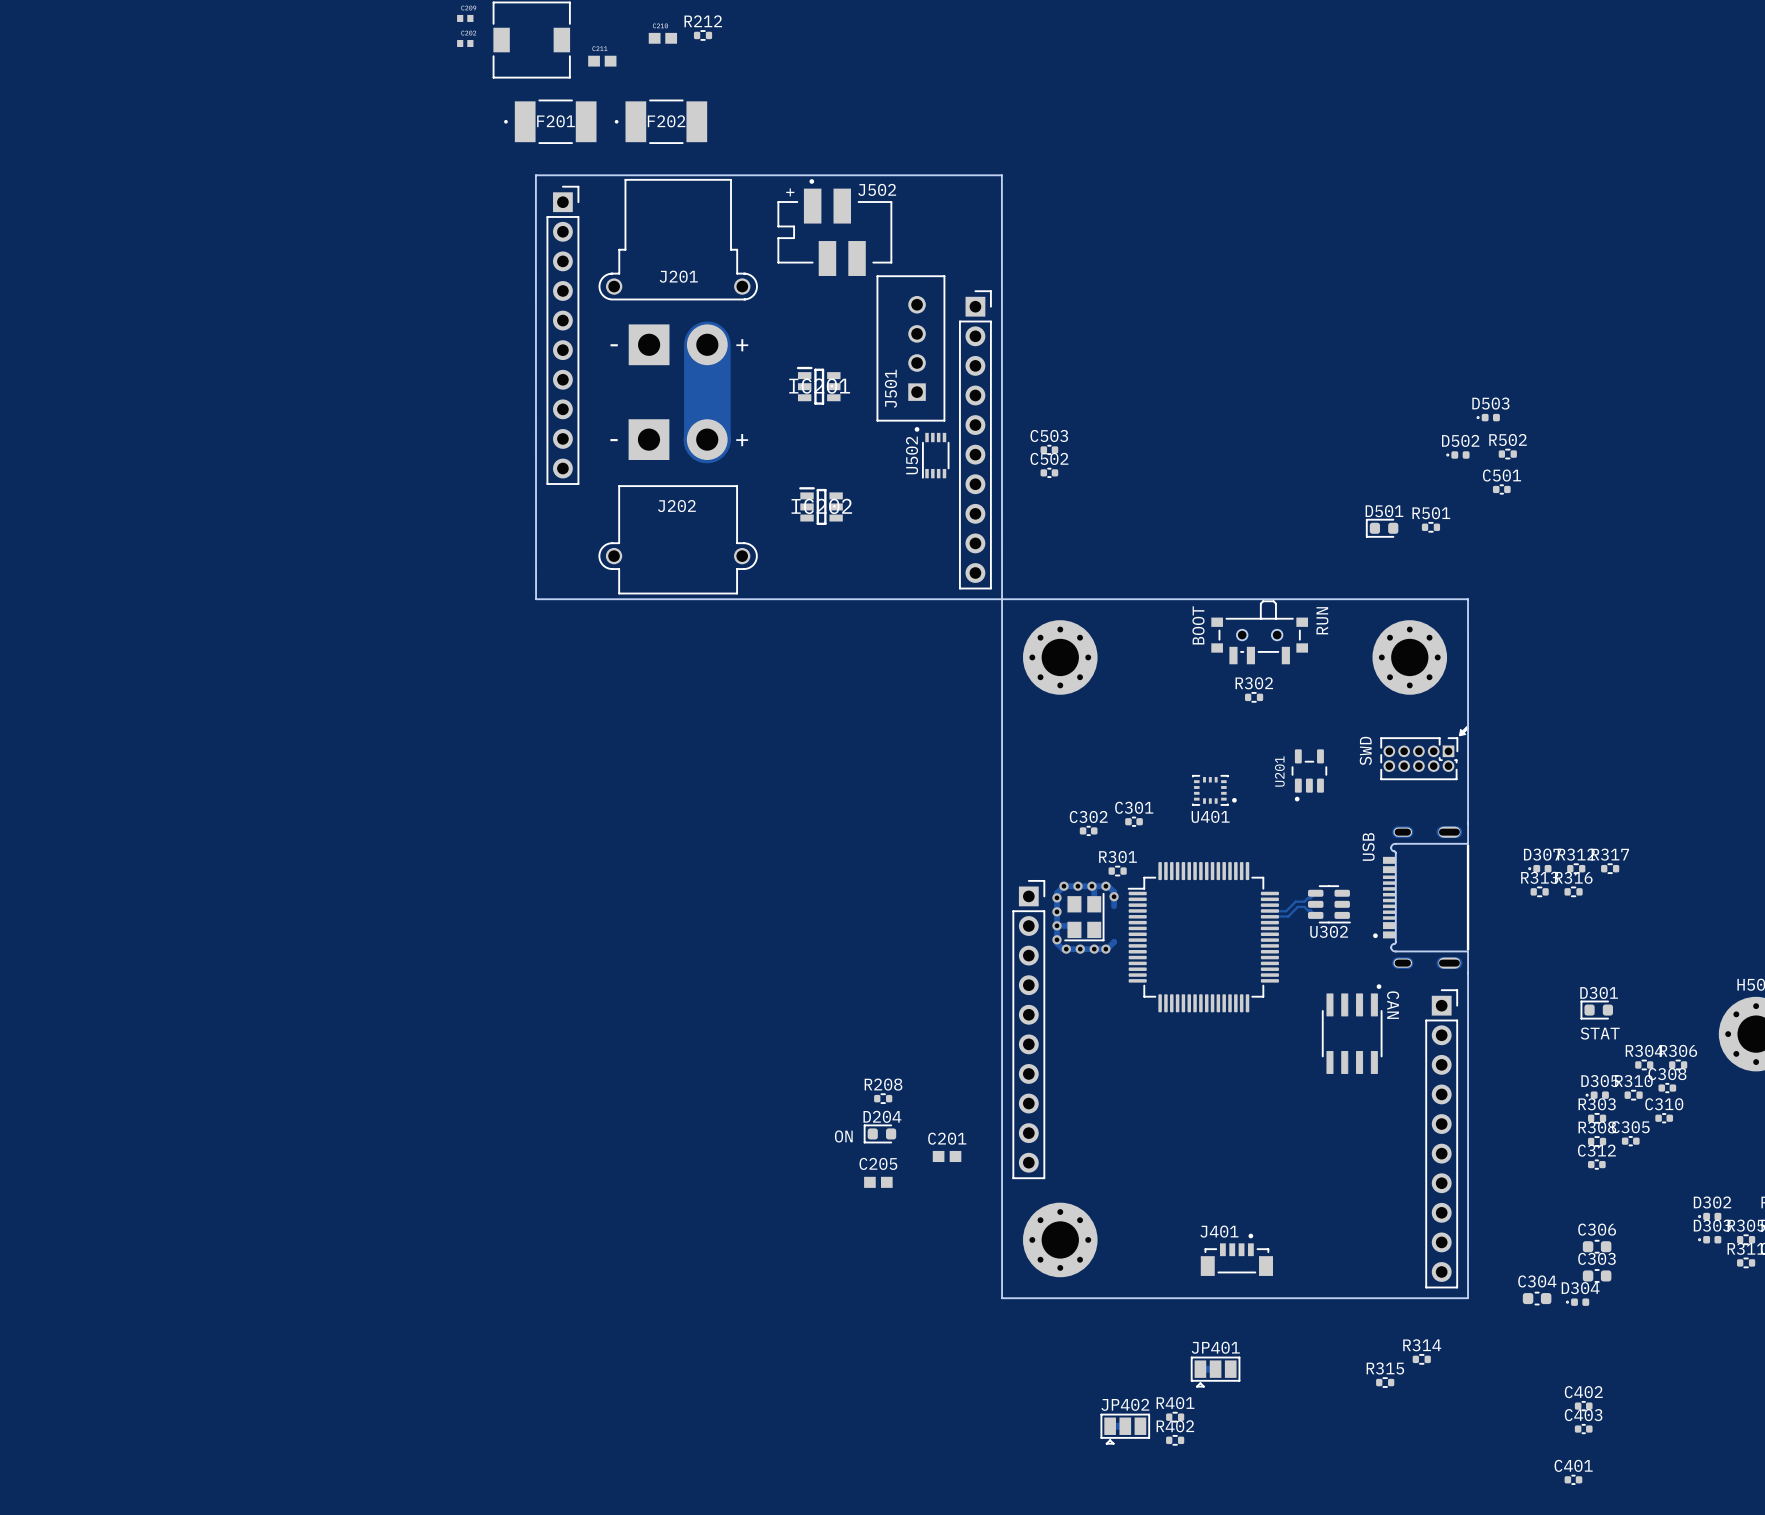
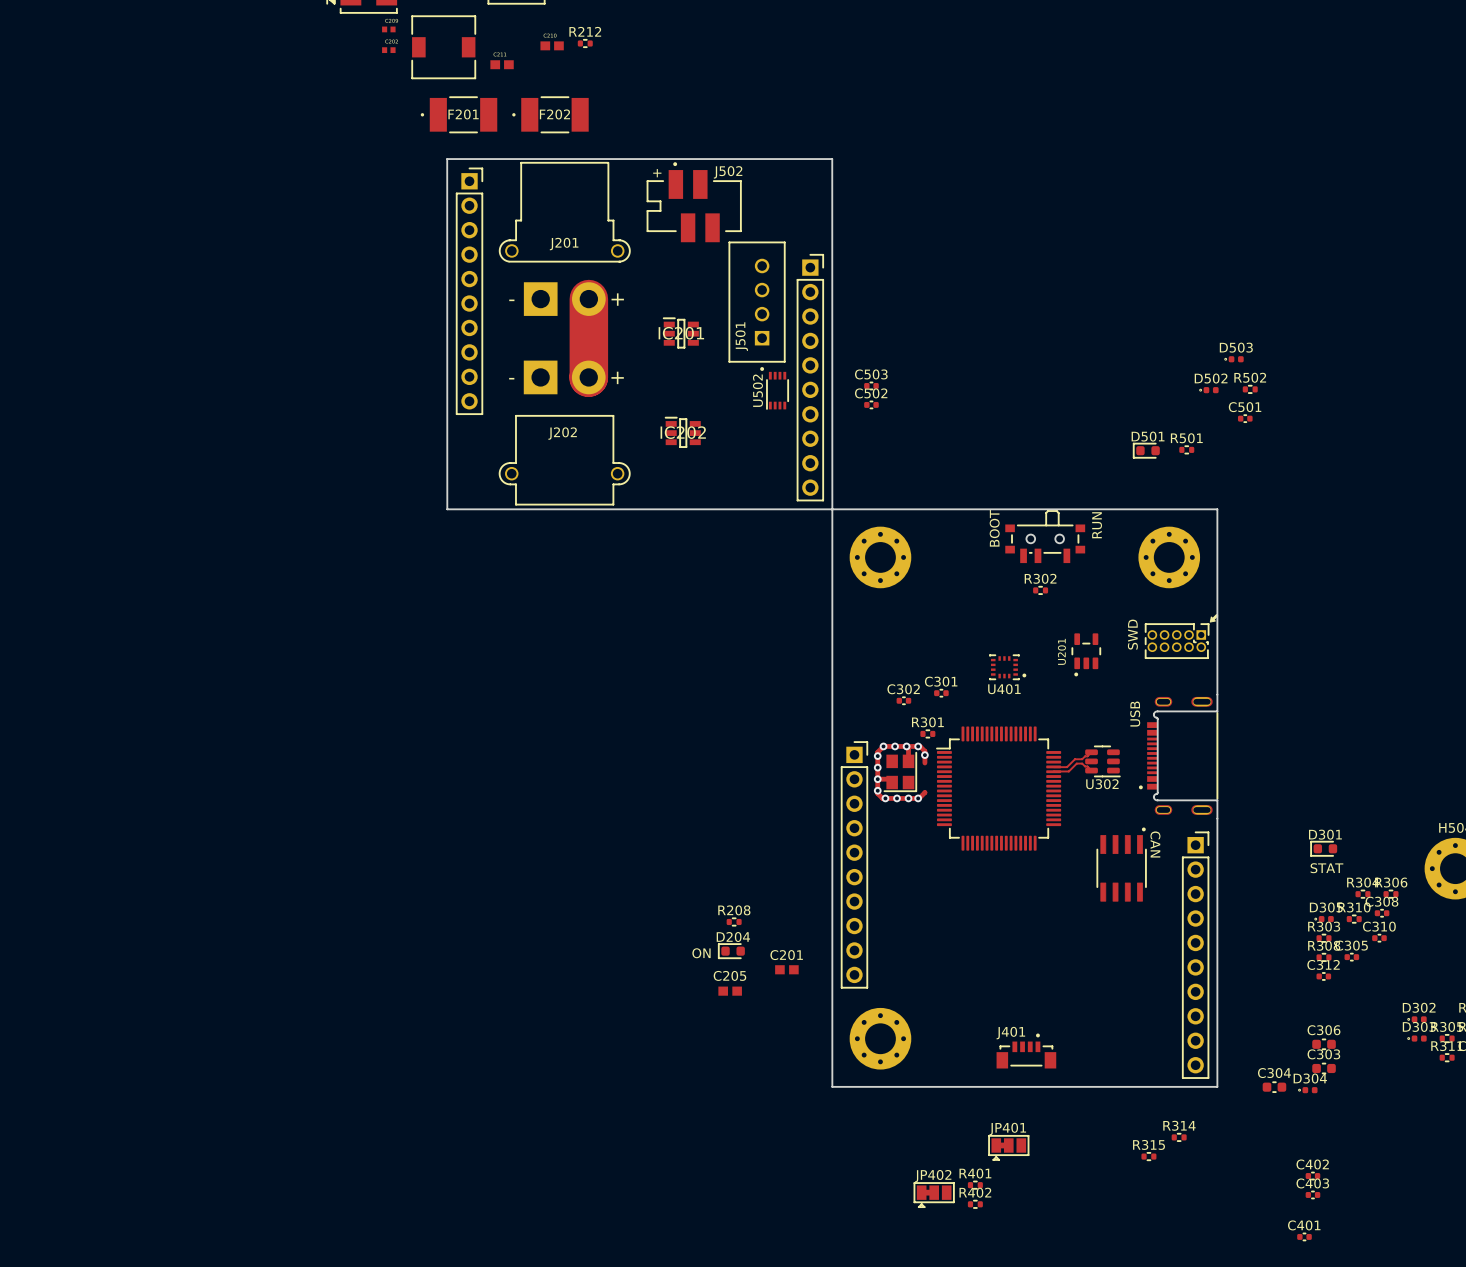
D307: (1540, 868) -> none
R312: (1576, 868) -> none
R317: (1610, 868) -> none
R313: (1539, 891) -> none
R316: (1573, 891) -> none

